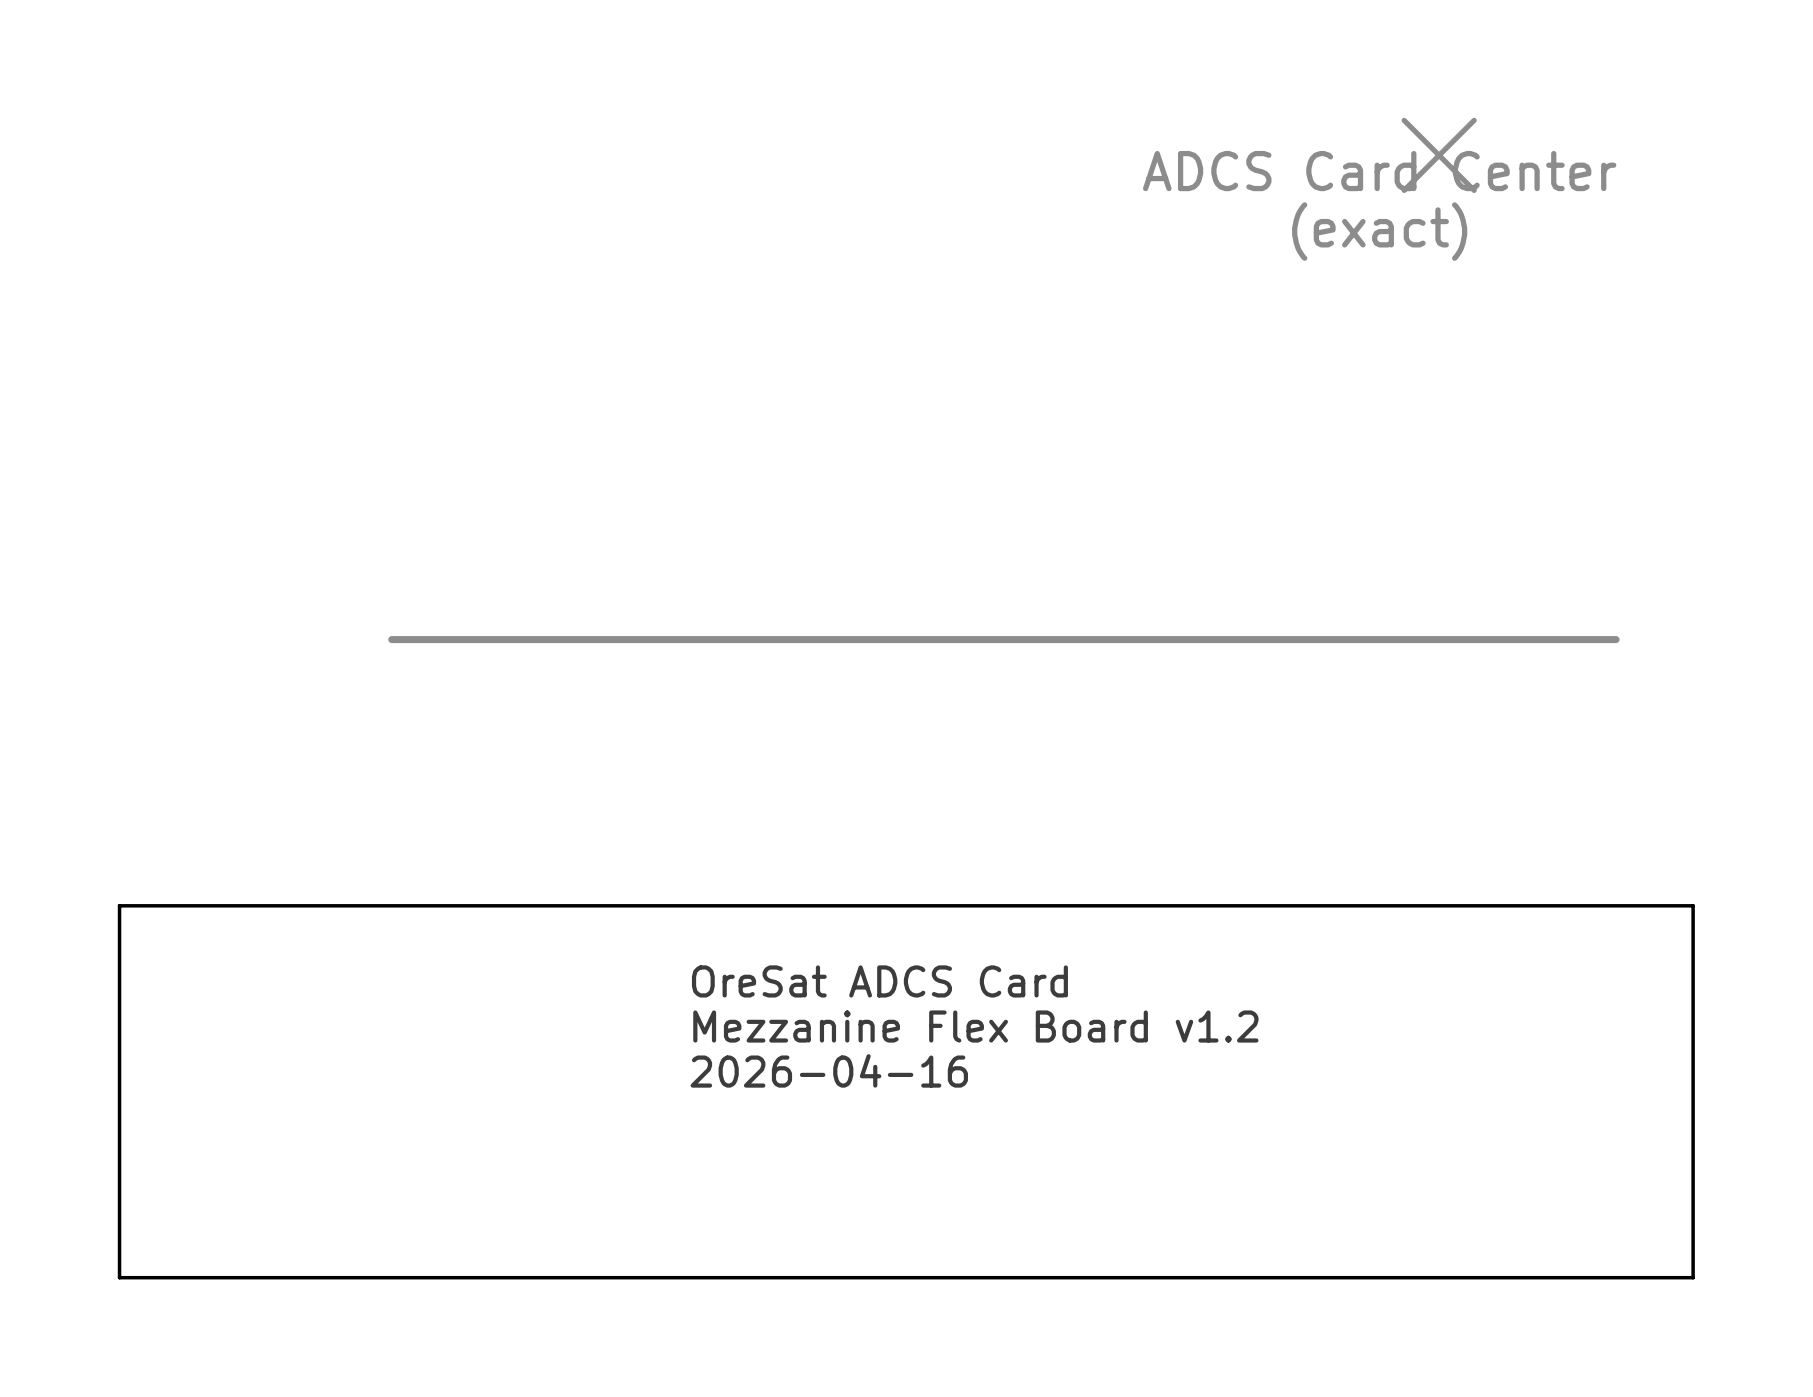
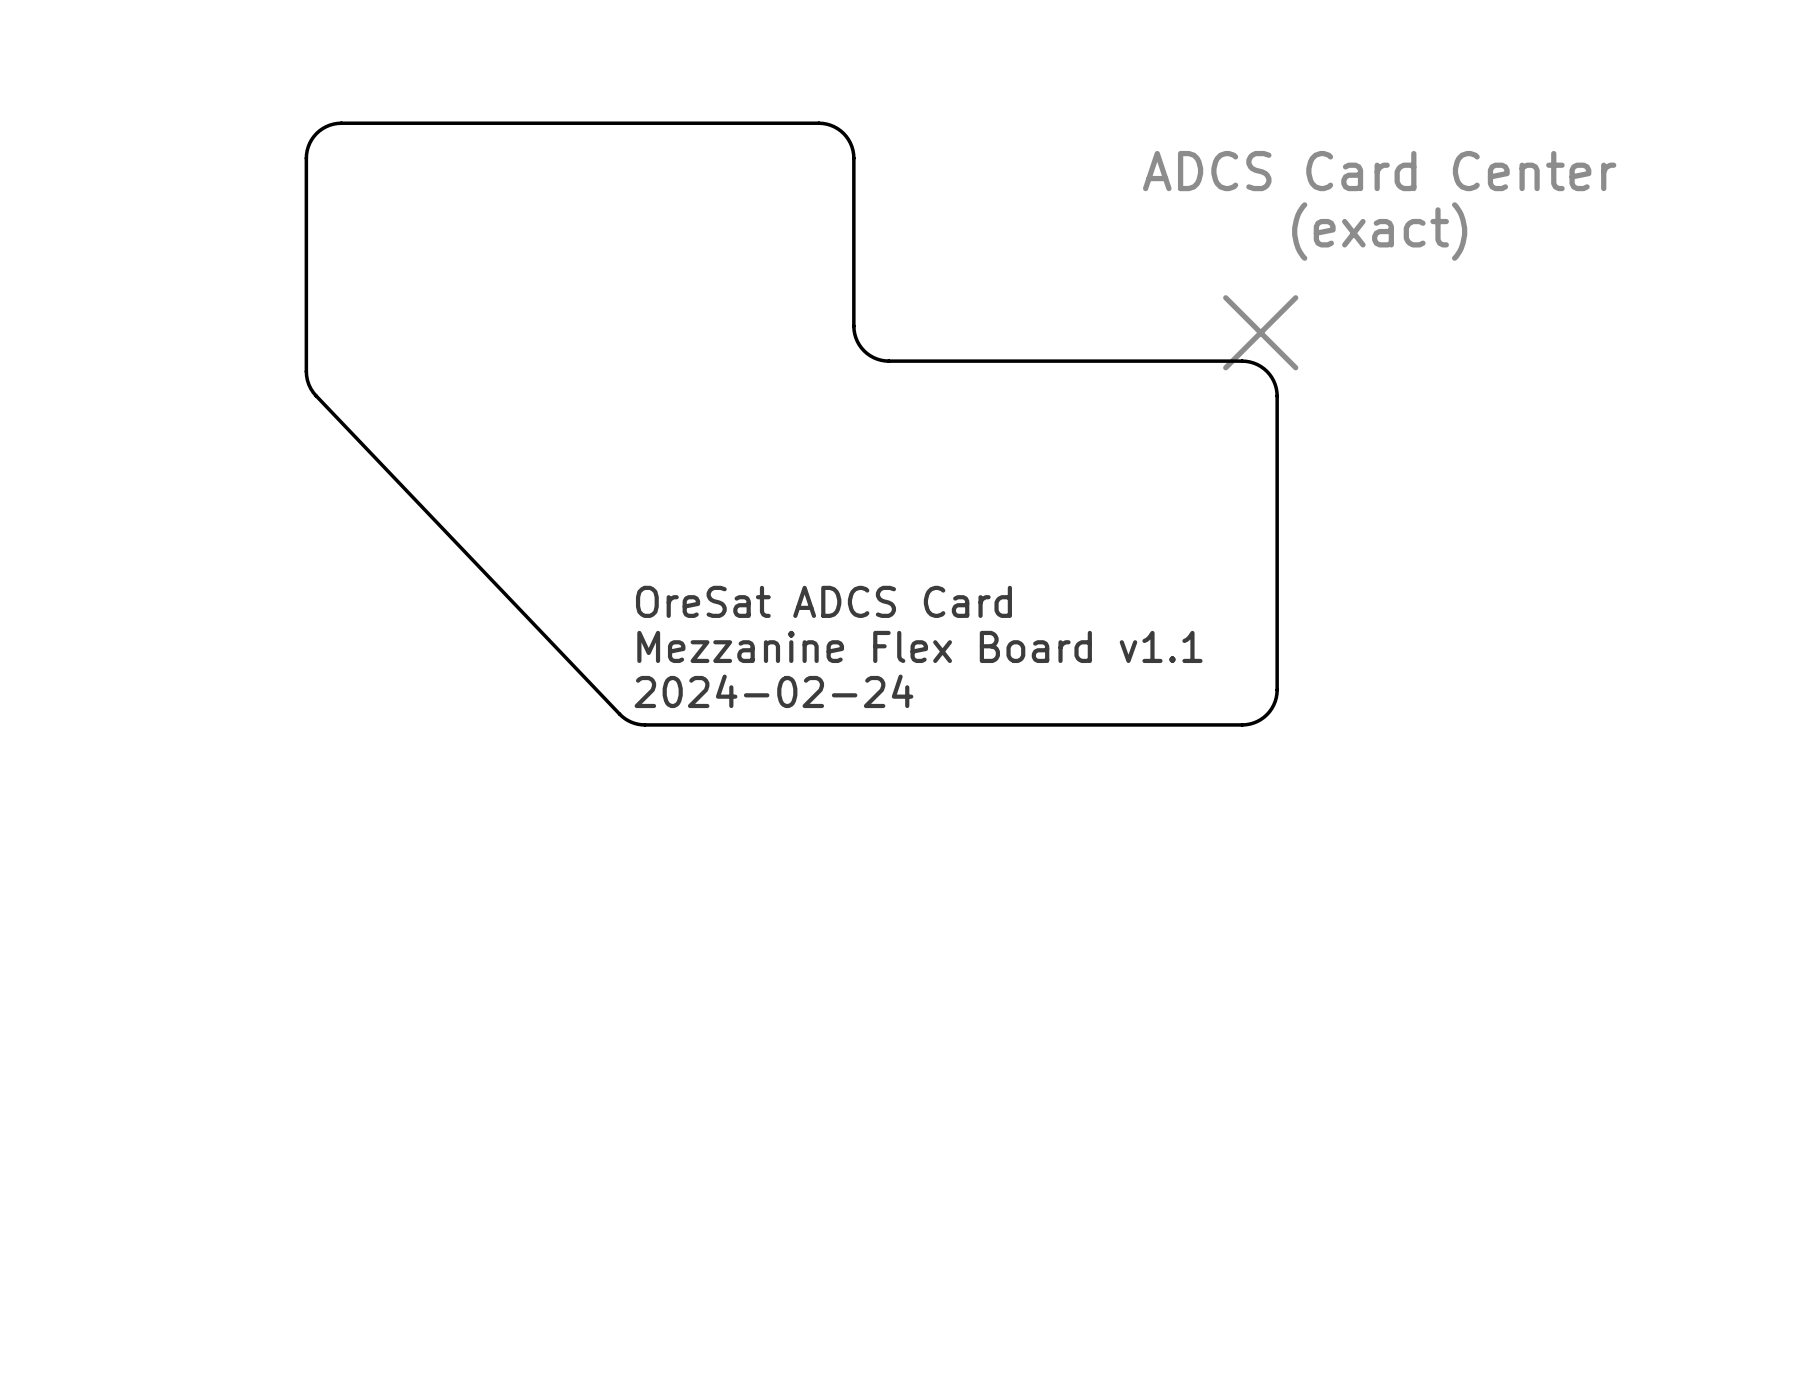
line: (1404, 120) (1474, 190) -> (1225, 297) (1295, 367)
line: (1474, 120) (1404, 190) -> (1295, 297) (1225, 367)
board edge: none -> (341, 123) (826, 124) (843, 133) (852, 150) (854, 330) (859, 344) (870, 355) (888, 361) (1242, 361) (1260, 366) (1271, 377) (1277, 396) (1277, 689) (1271, 708) (1257, 721) (1242, 724) (644, 724) (634, 723) (624, 718) (310, 388) (306, 371) (306, 154) (309, 143) (316, 133) (326, 126) (341, 123)
line: (391, 639) (1616, 639) -> none
text: none -> Mezzanine Flex Board v1.1 (919, 646)
text: none -> 2024-02-24 (773, 691)
board edge: (119, 905) (1693, 905) (1693, 1277) (119, 1277) (119, 905) -> none
text position: OreSat ADCS Card (879, 981) -> OreSat ADCS Card (823, 601)
text: Mezzanine Flex Board v1.2 (975, 1026) -> none
text: 2026-04-16 (829, 1070) -> none

